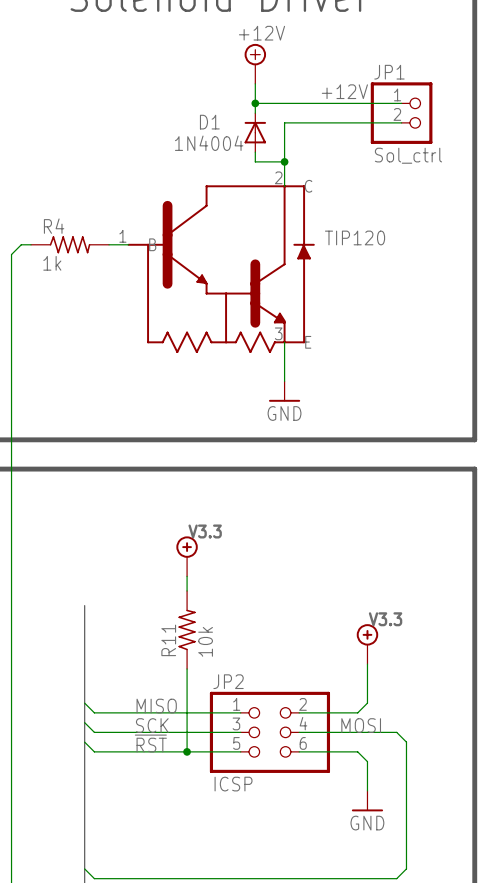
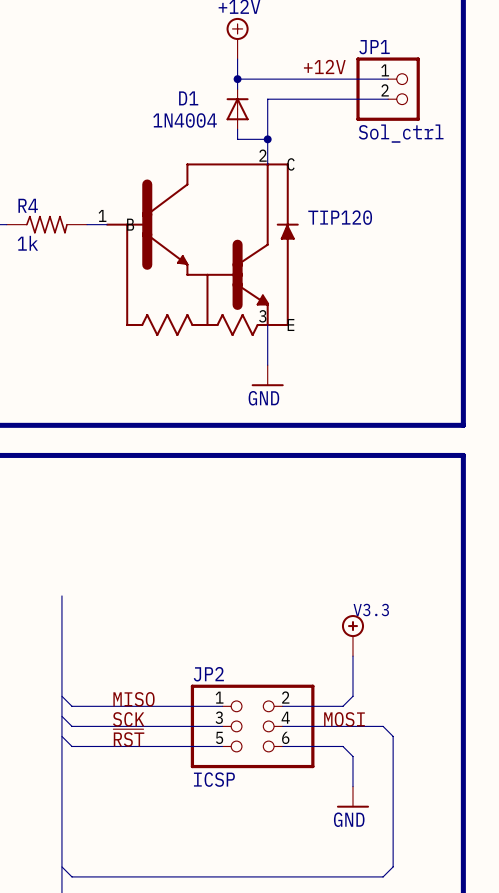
power symbol: V3.3 (187, 556) -> none
wire: (187, 576) (187, 590) -> none
R11: 10k (187, 629) -> none
wire: (187, 668) (187, 751) -> none
junction: (187, 751) -> none

